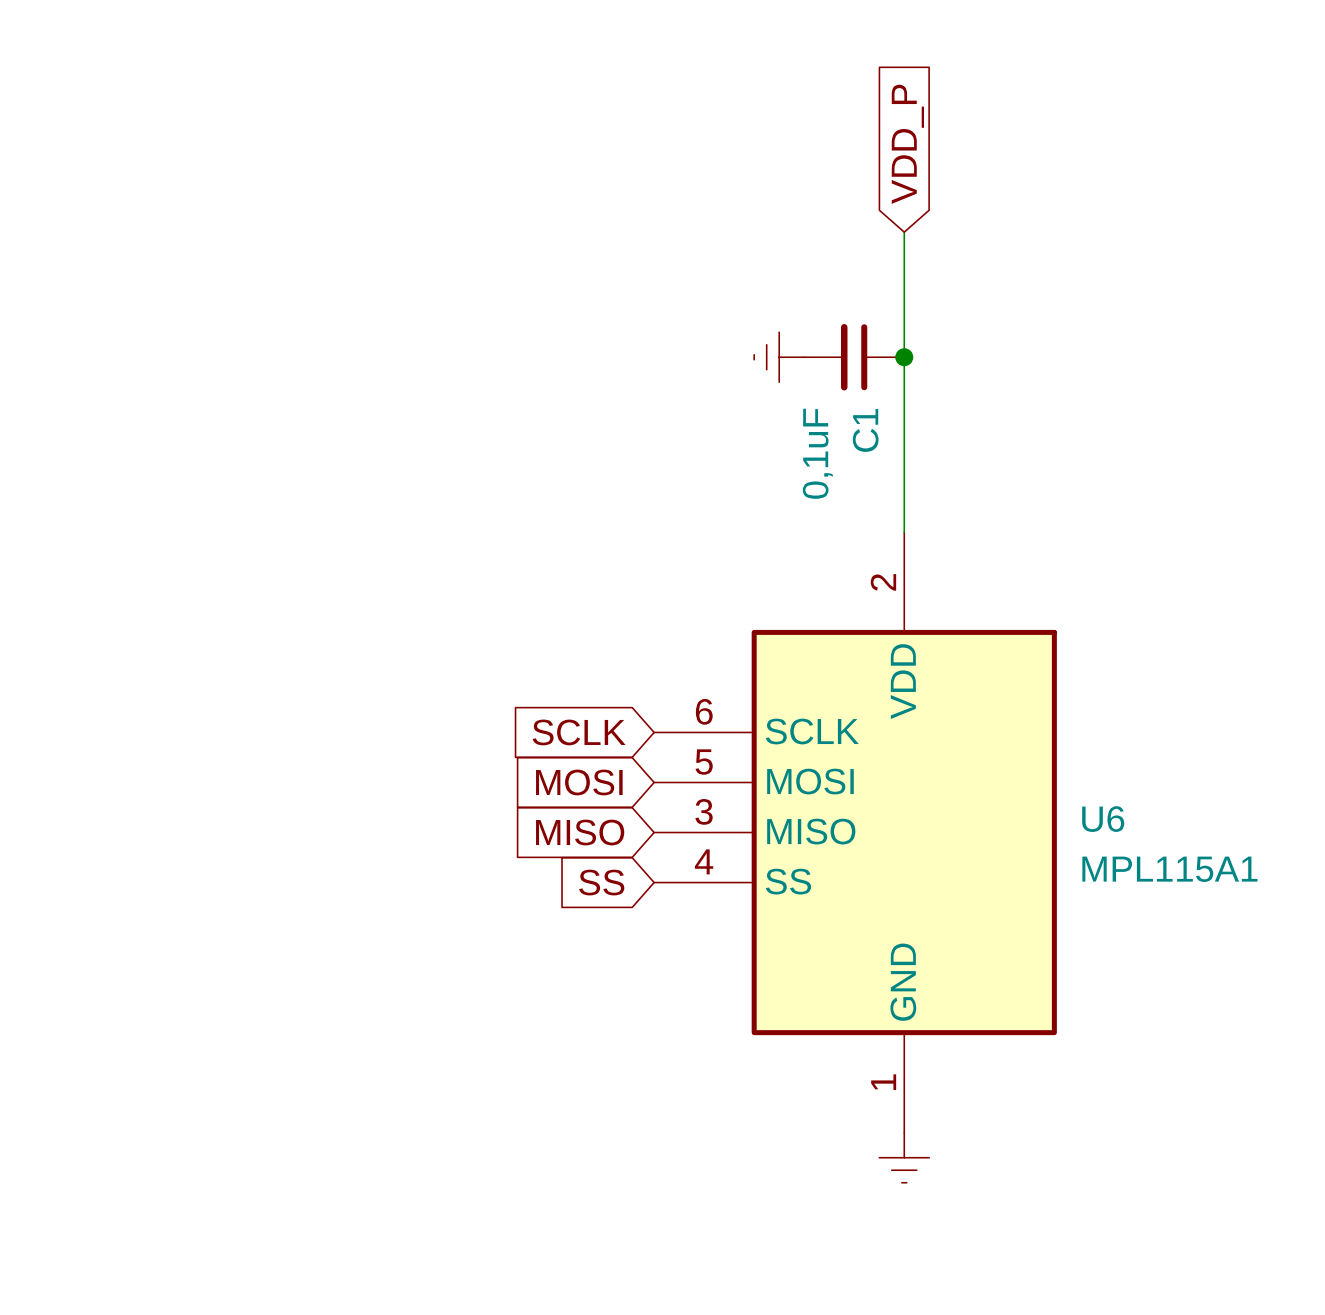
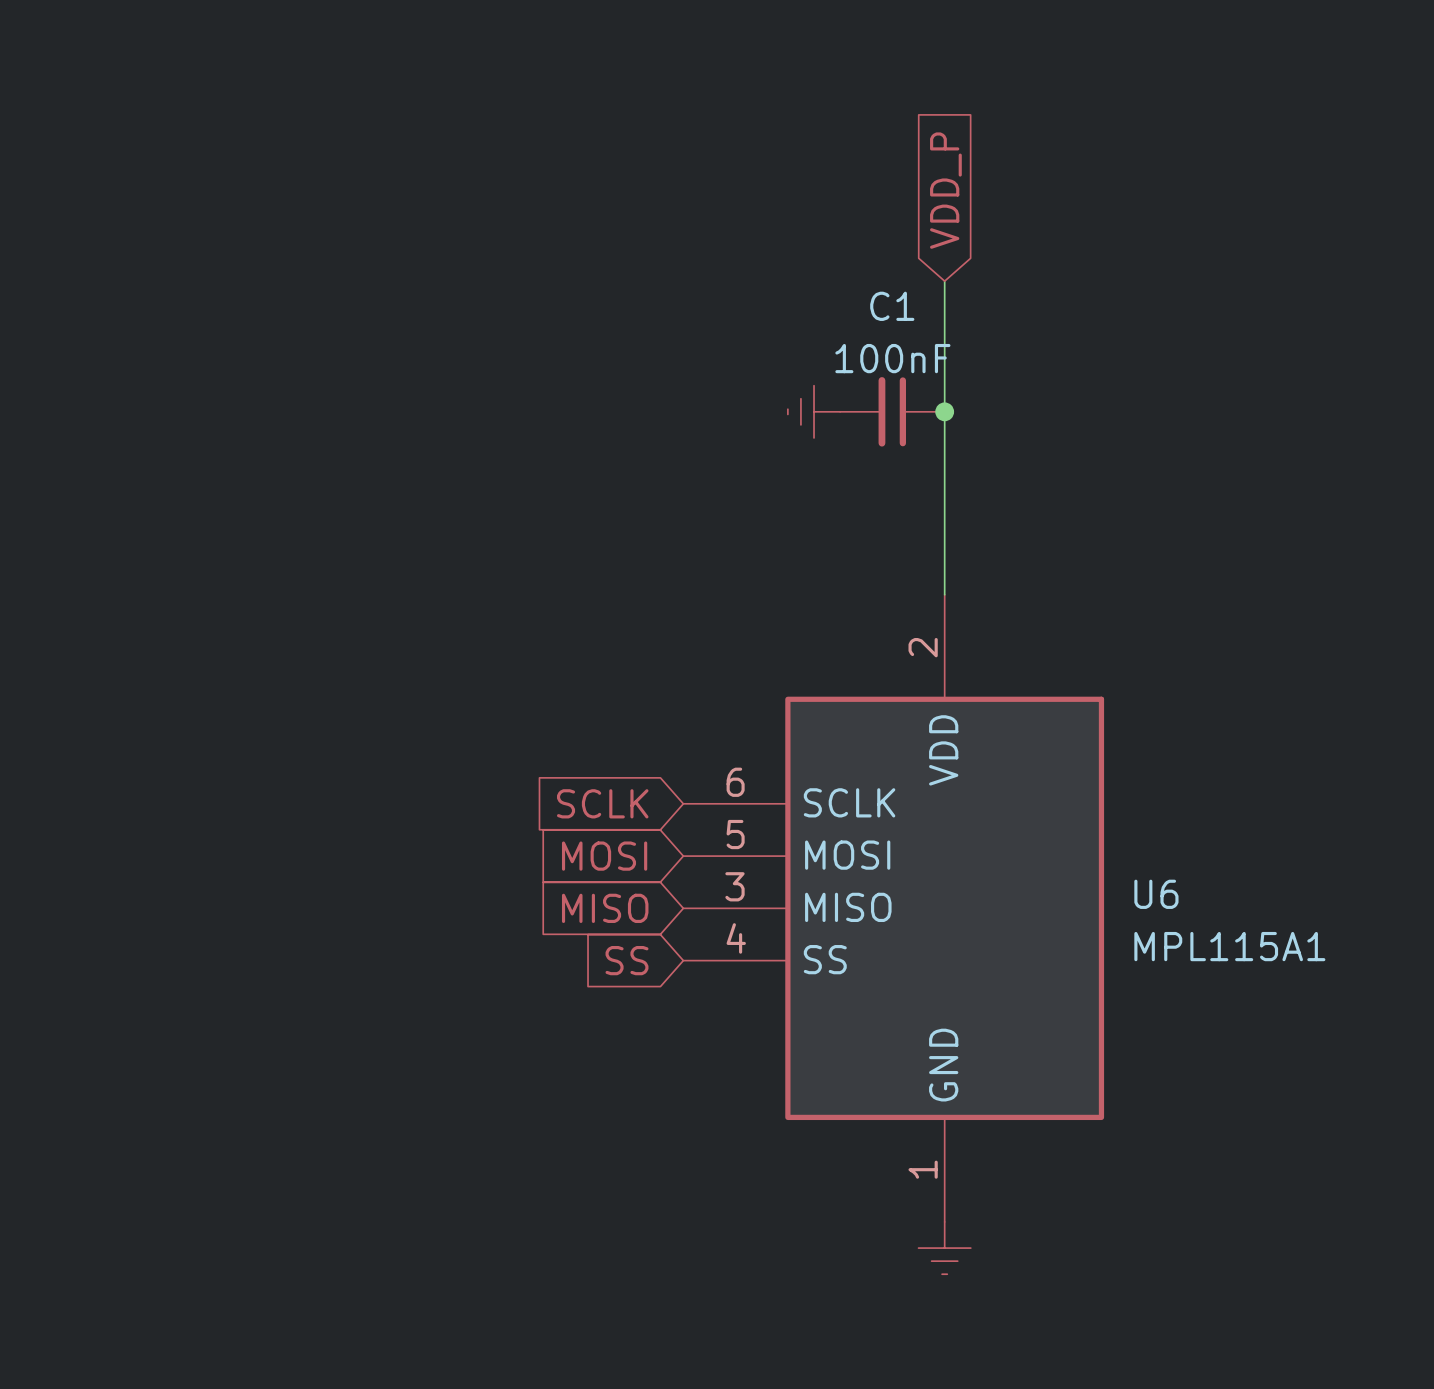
C1 name rotation: 0° (865, 430) -> 90° clockwise (892, 306)
C1 name position: C1 (865, 430) -> C1 (892, 306)
C1 value: 0,1uF (817, 453) -> 100nF (892, 358)

